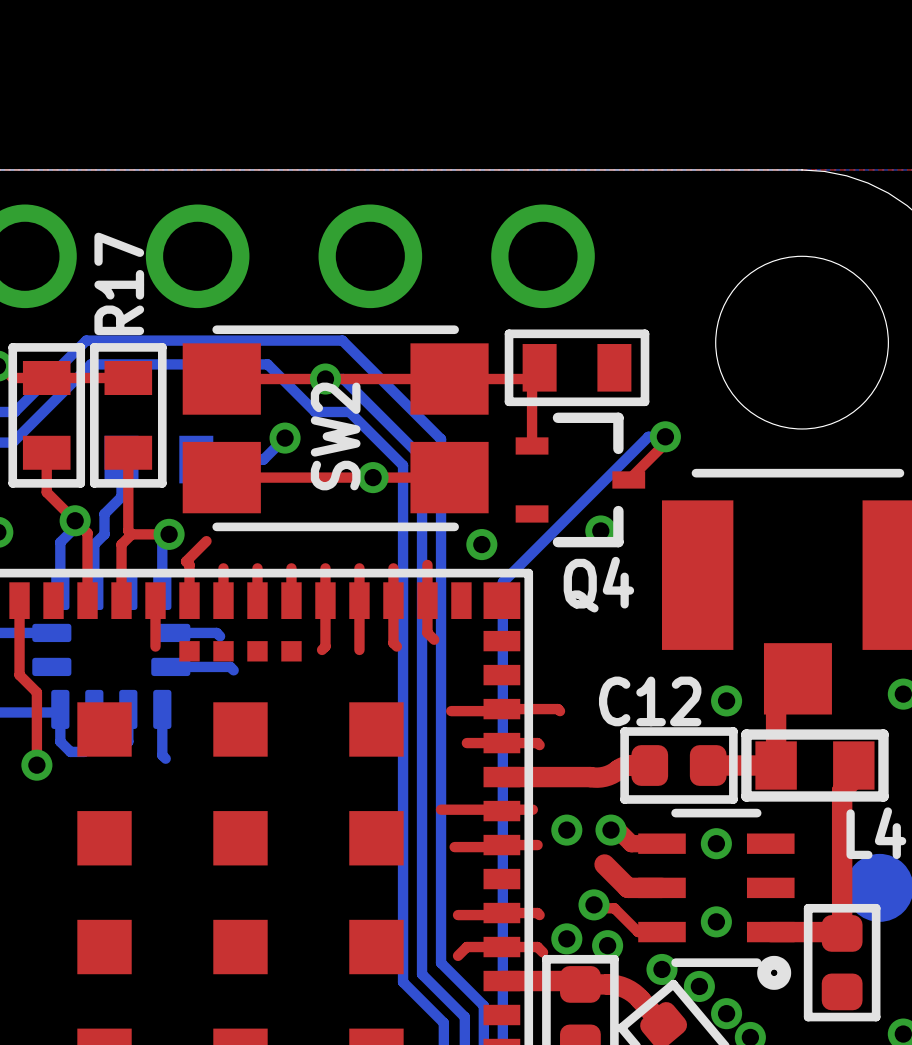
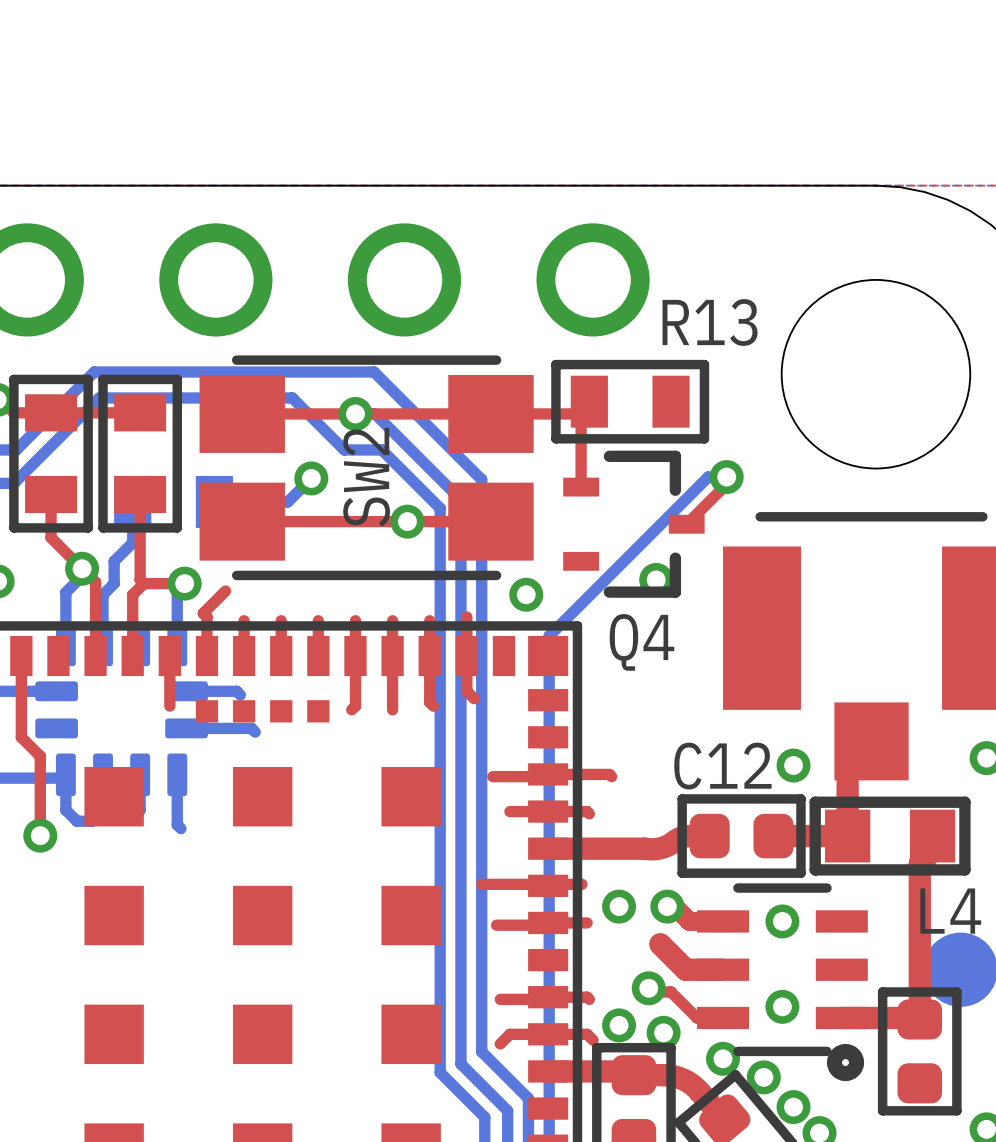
R17 name: R17 (119, 283) -> none
R13 name: none -> R13 (710, 322)

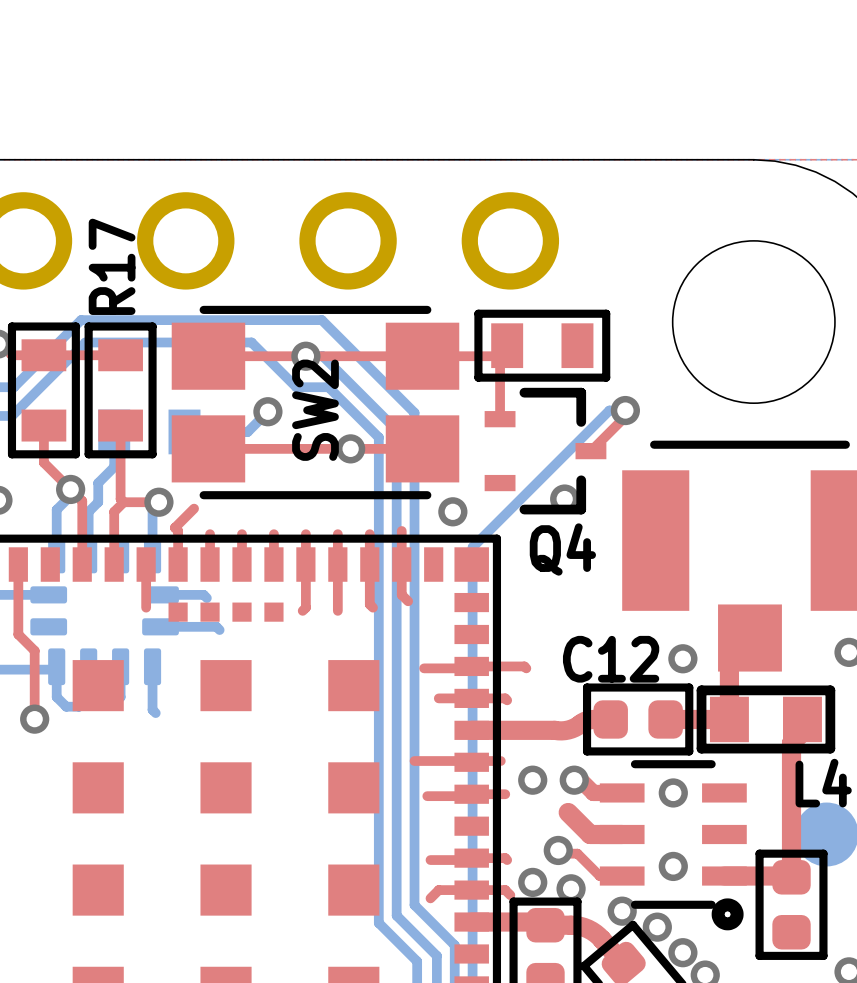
R17 name: none -> R17 (112, 266)
R13 name: R13 (710, 322) -> none

